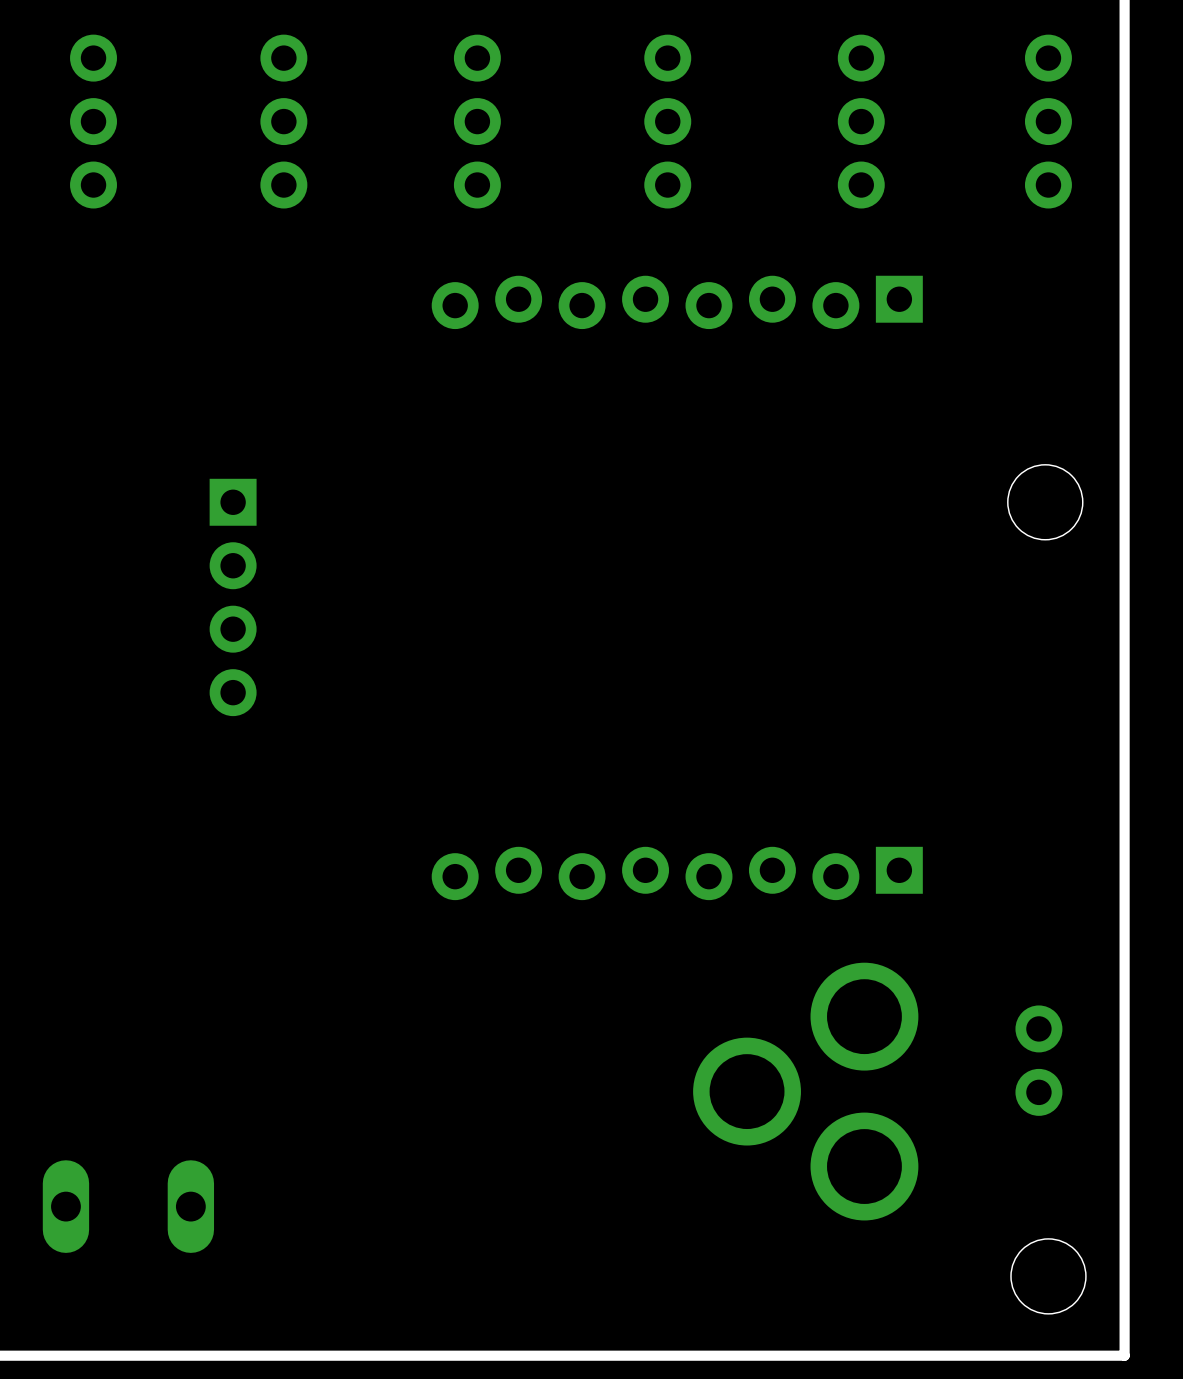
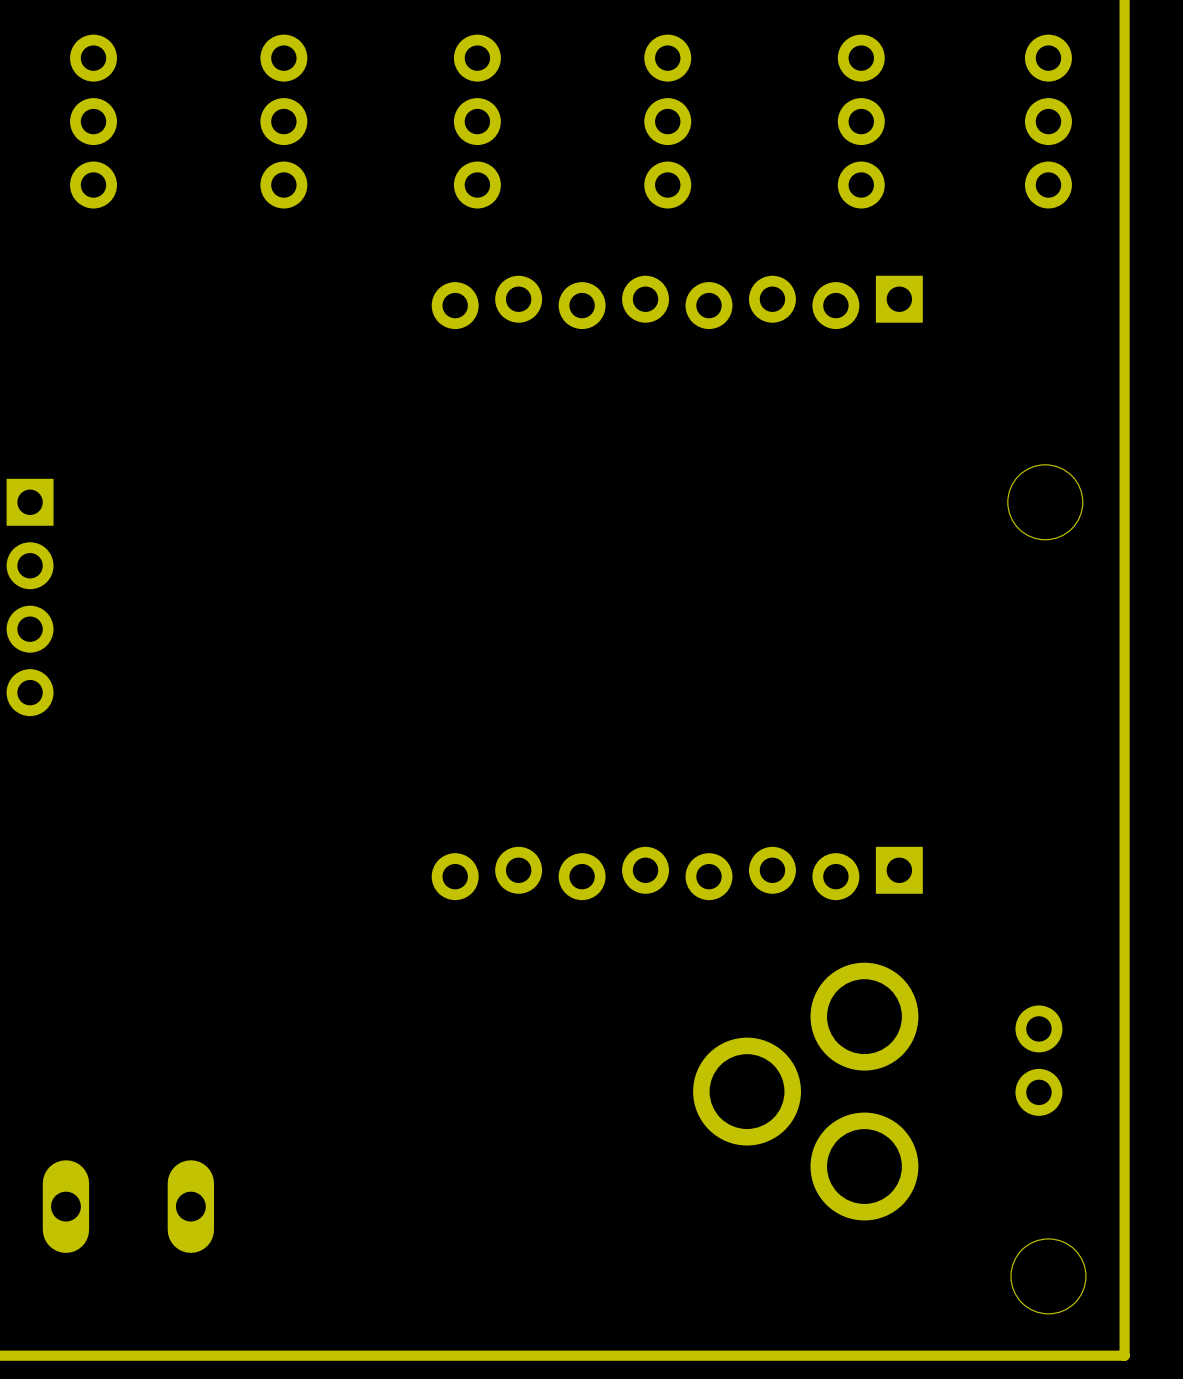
part position: (233, 597) -> (30, 597)

